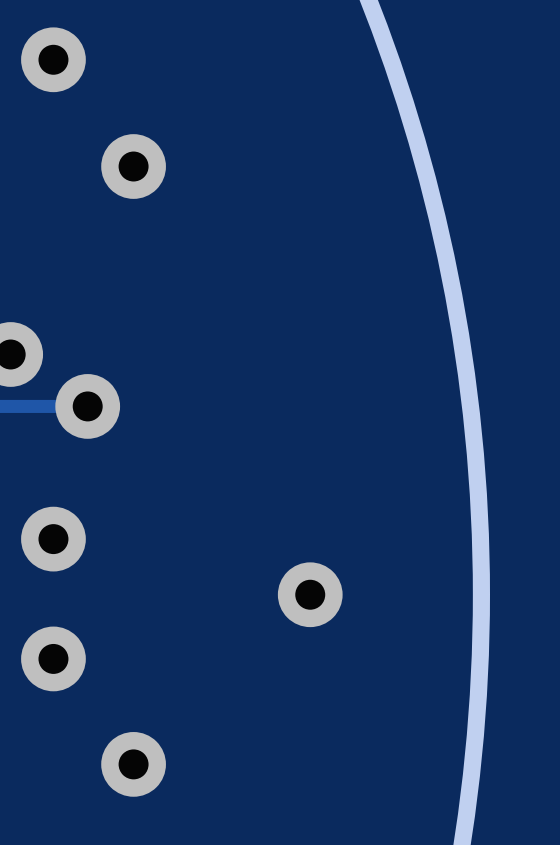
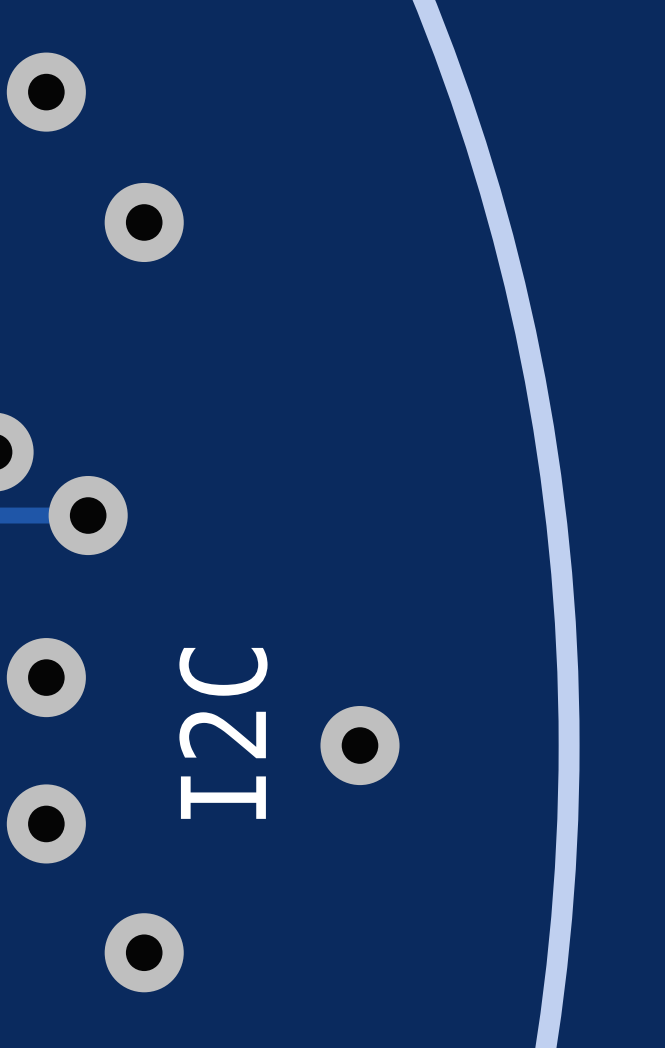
text: none -> I2C (223, 733)

